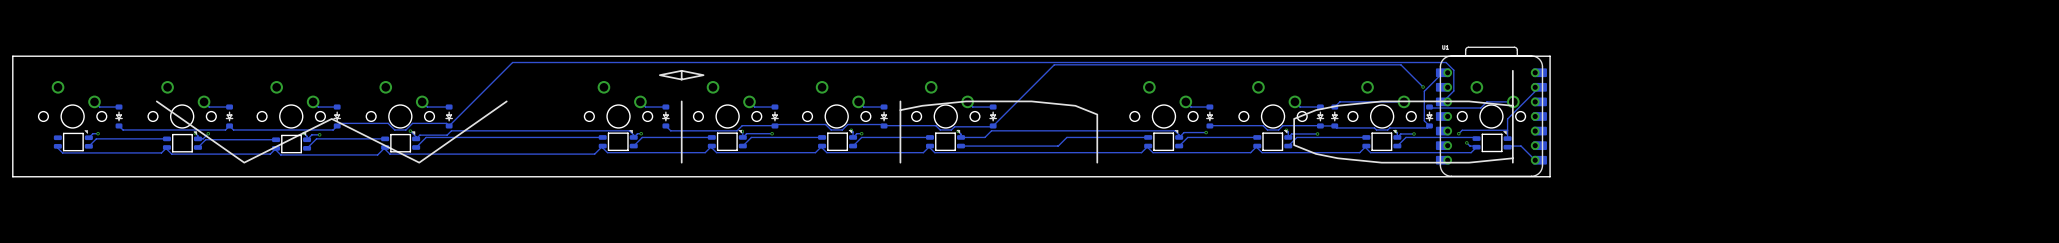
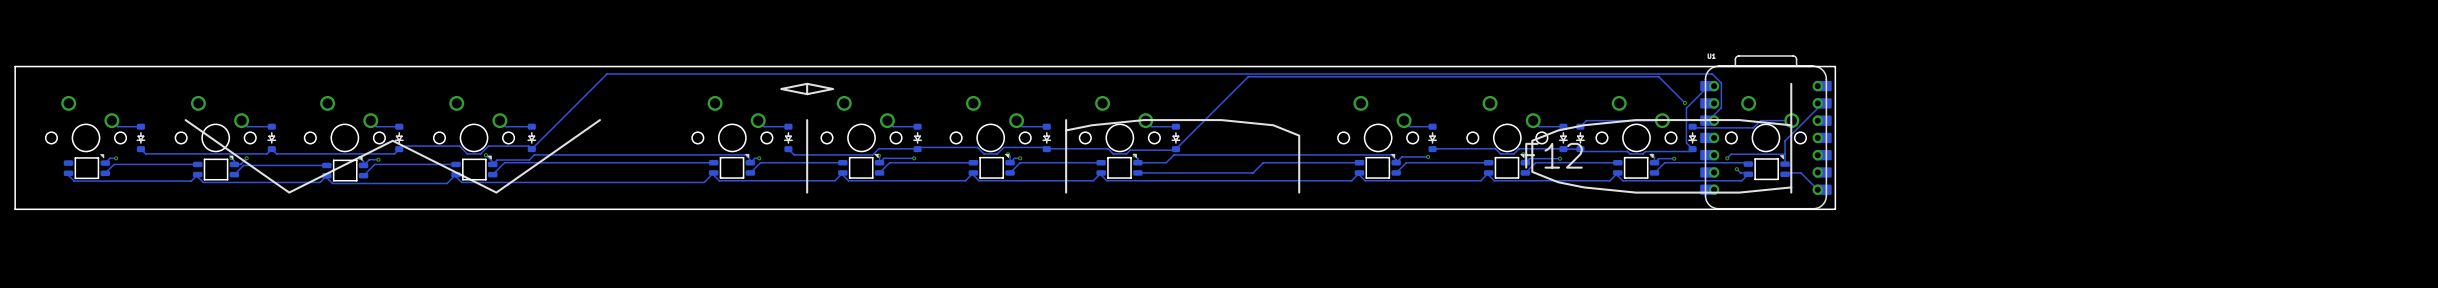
text: none -> F12 (1553, 155)

